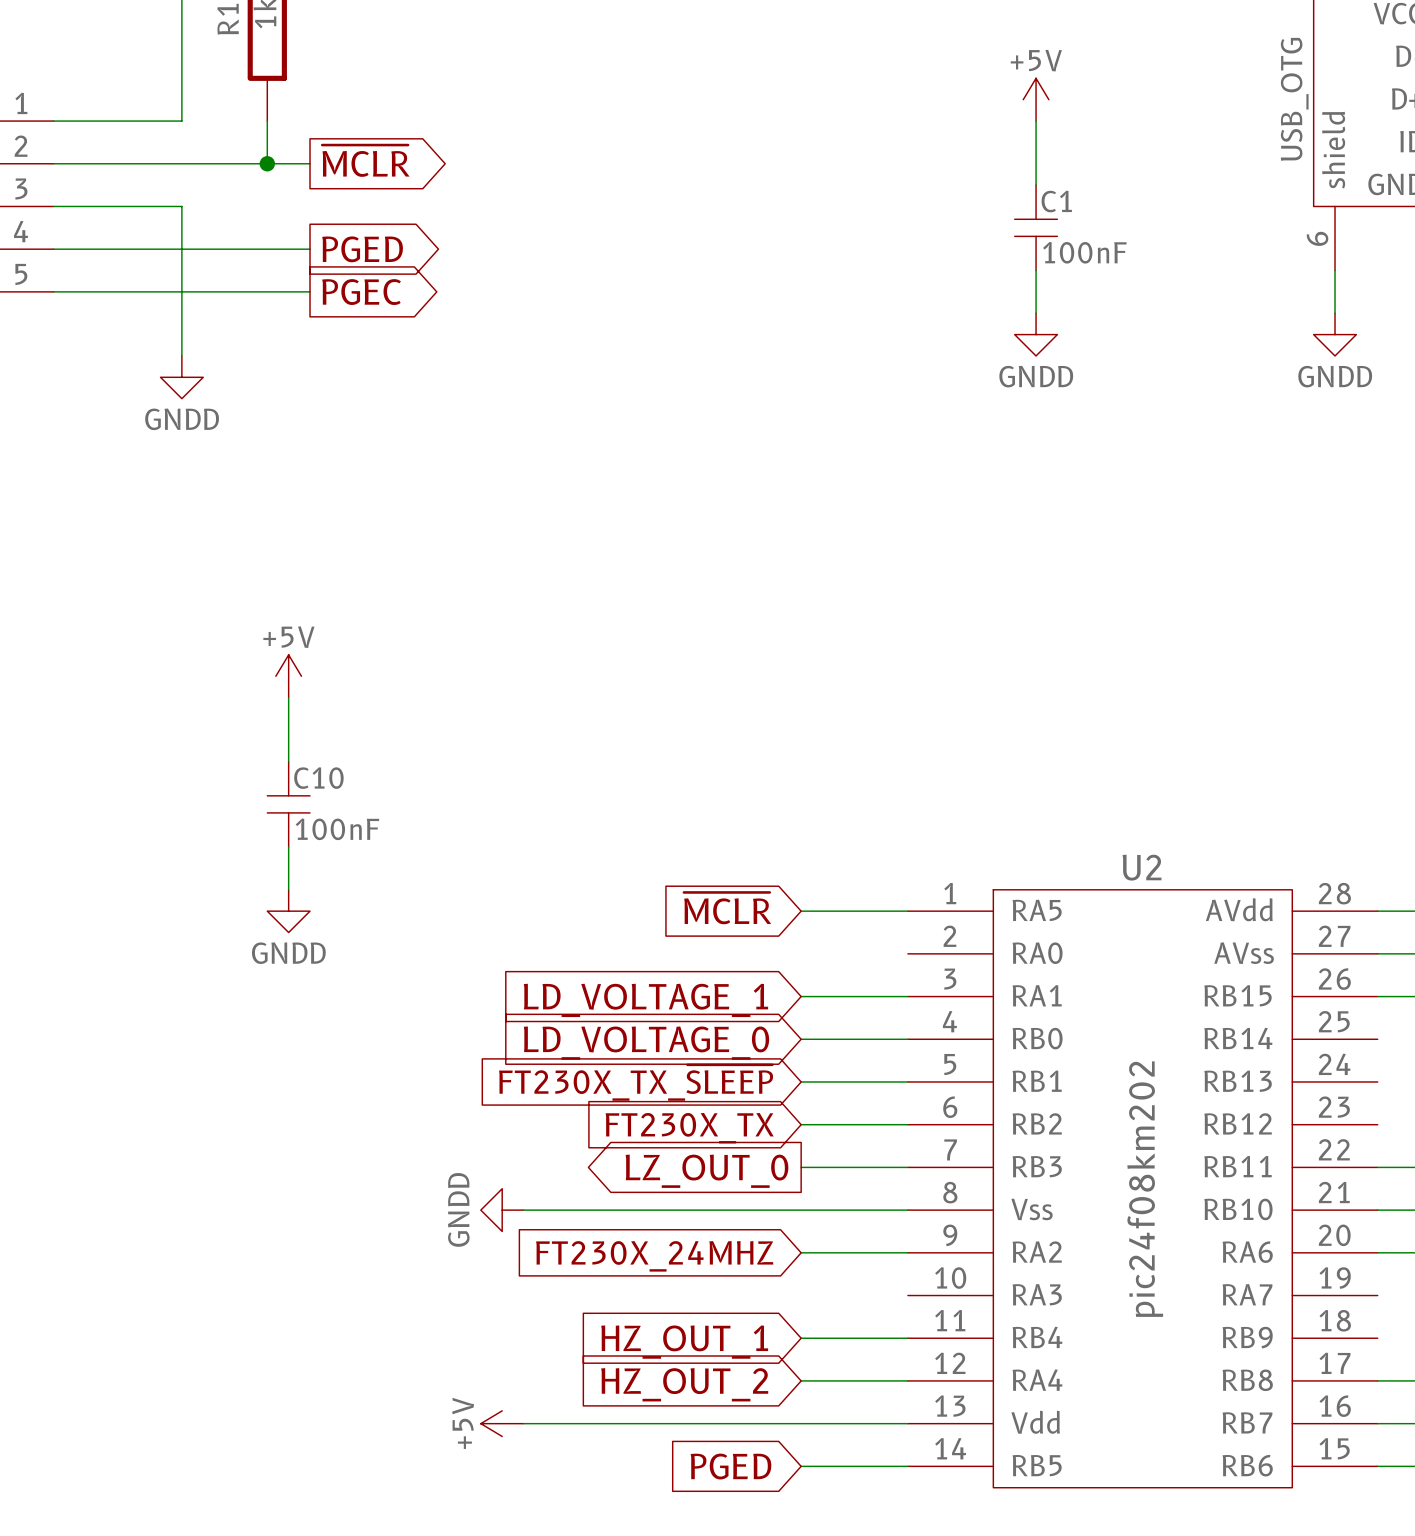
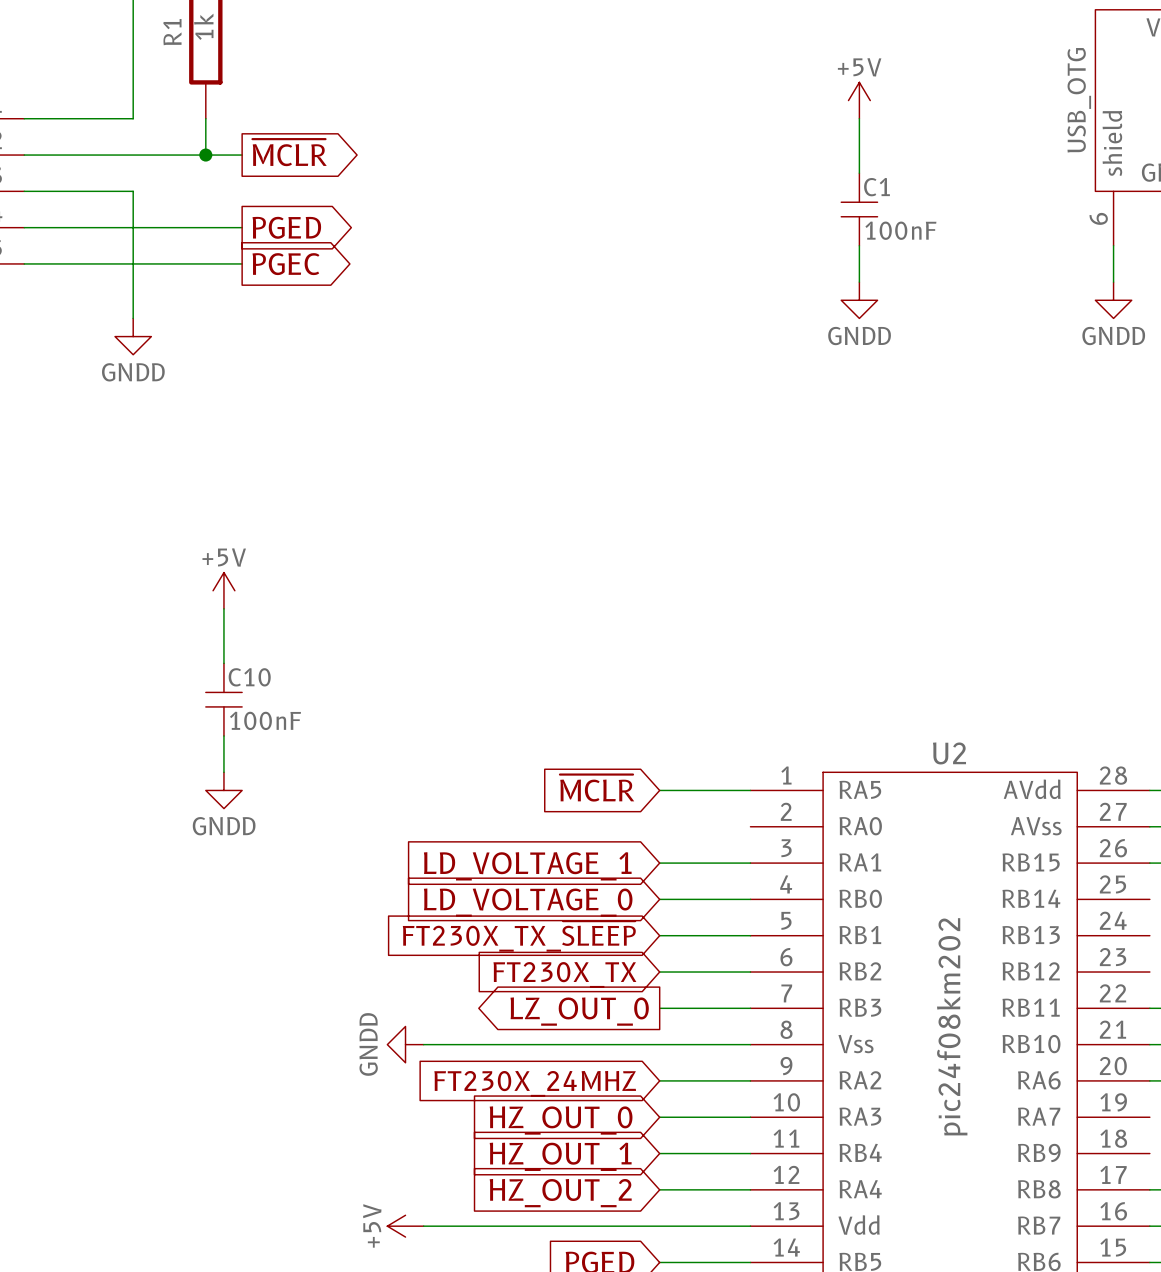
wire: none -> (659, 1117) (750, 1117)
global label: none -> HZ_OUT_0 (561, 1120)

